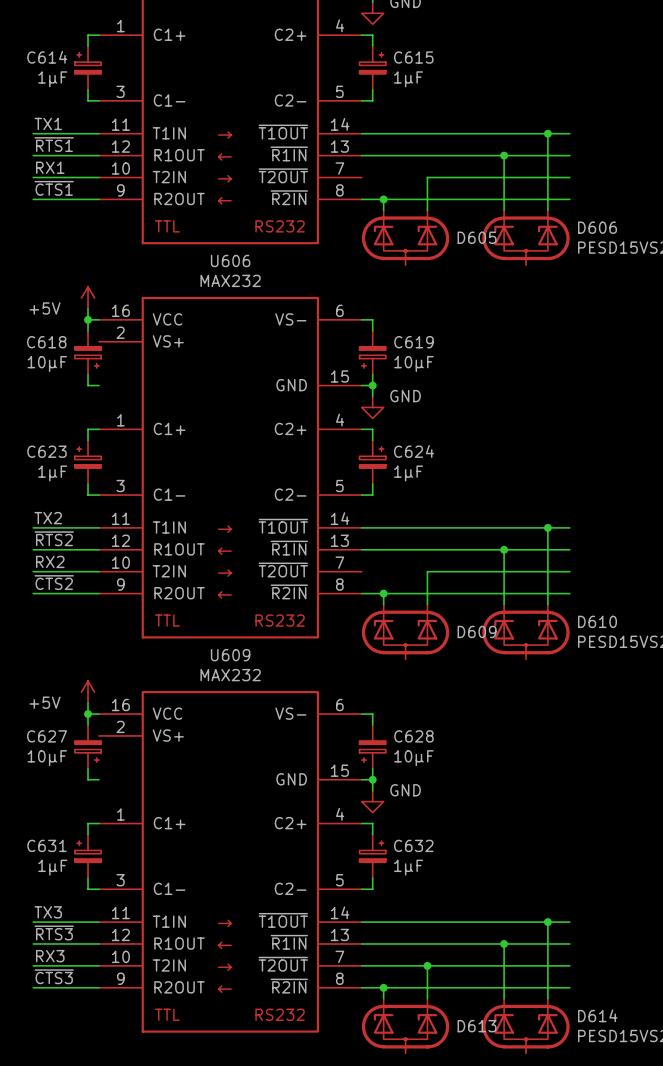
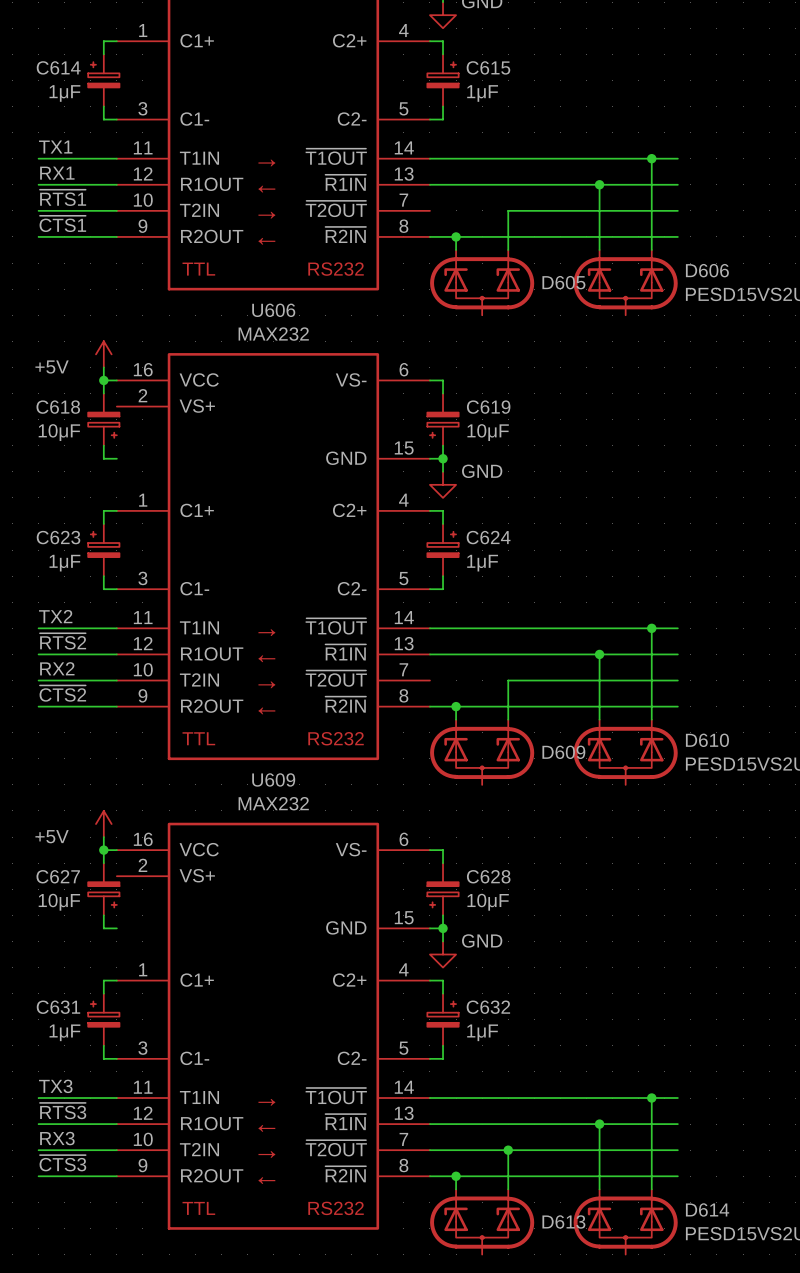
label: ~{RTS1} (54, 144) -> RX1 (57, 173)
label: RX1 (50, 167) -> ~{RTS1} (63, 197)

